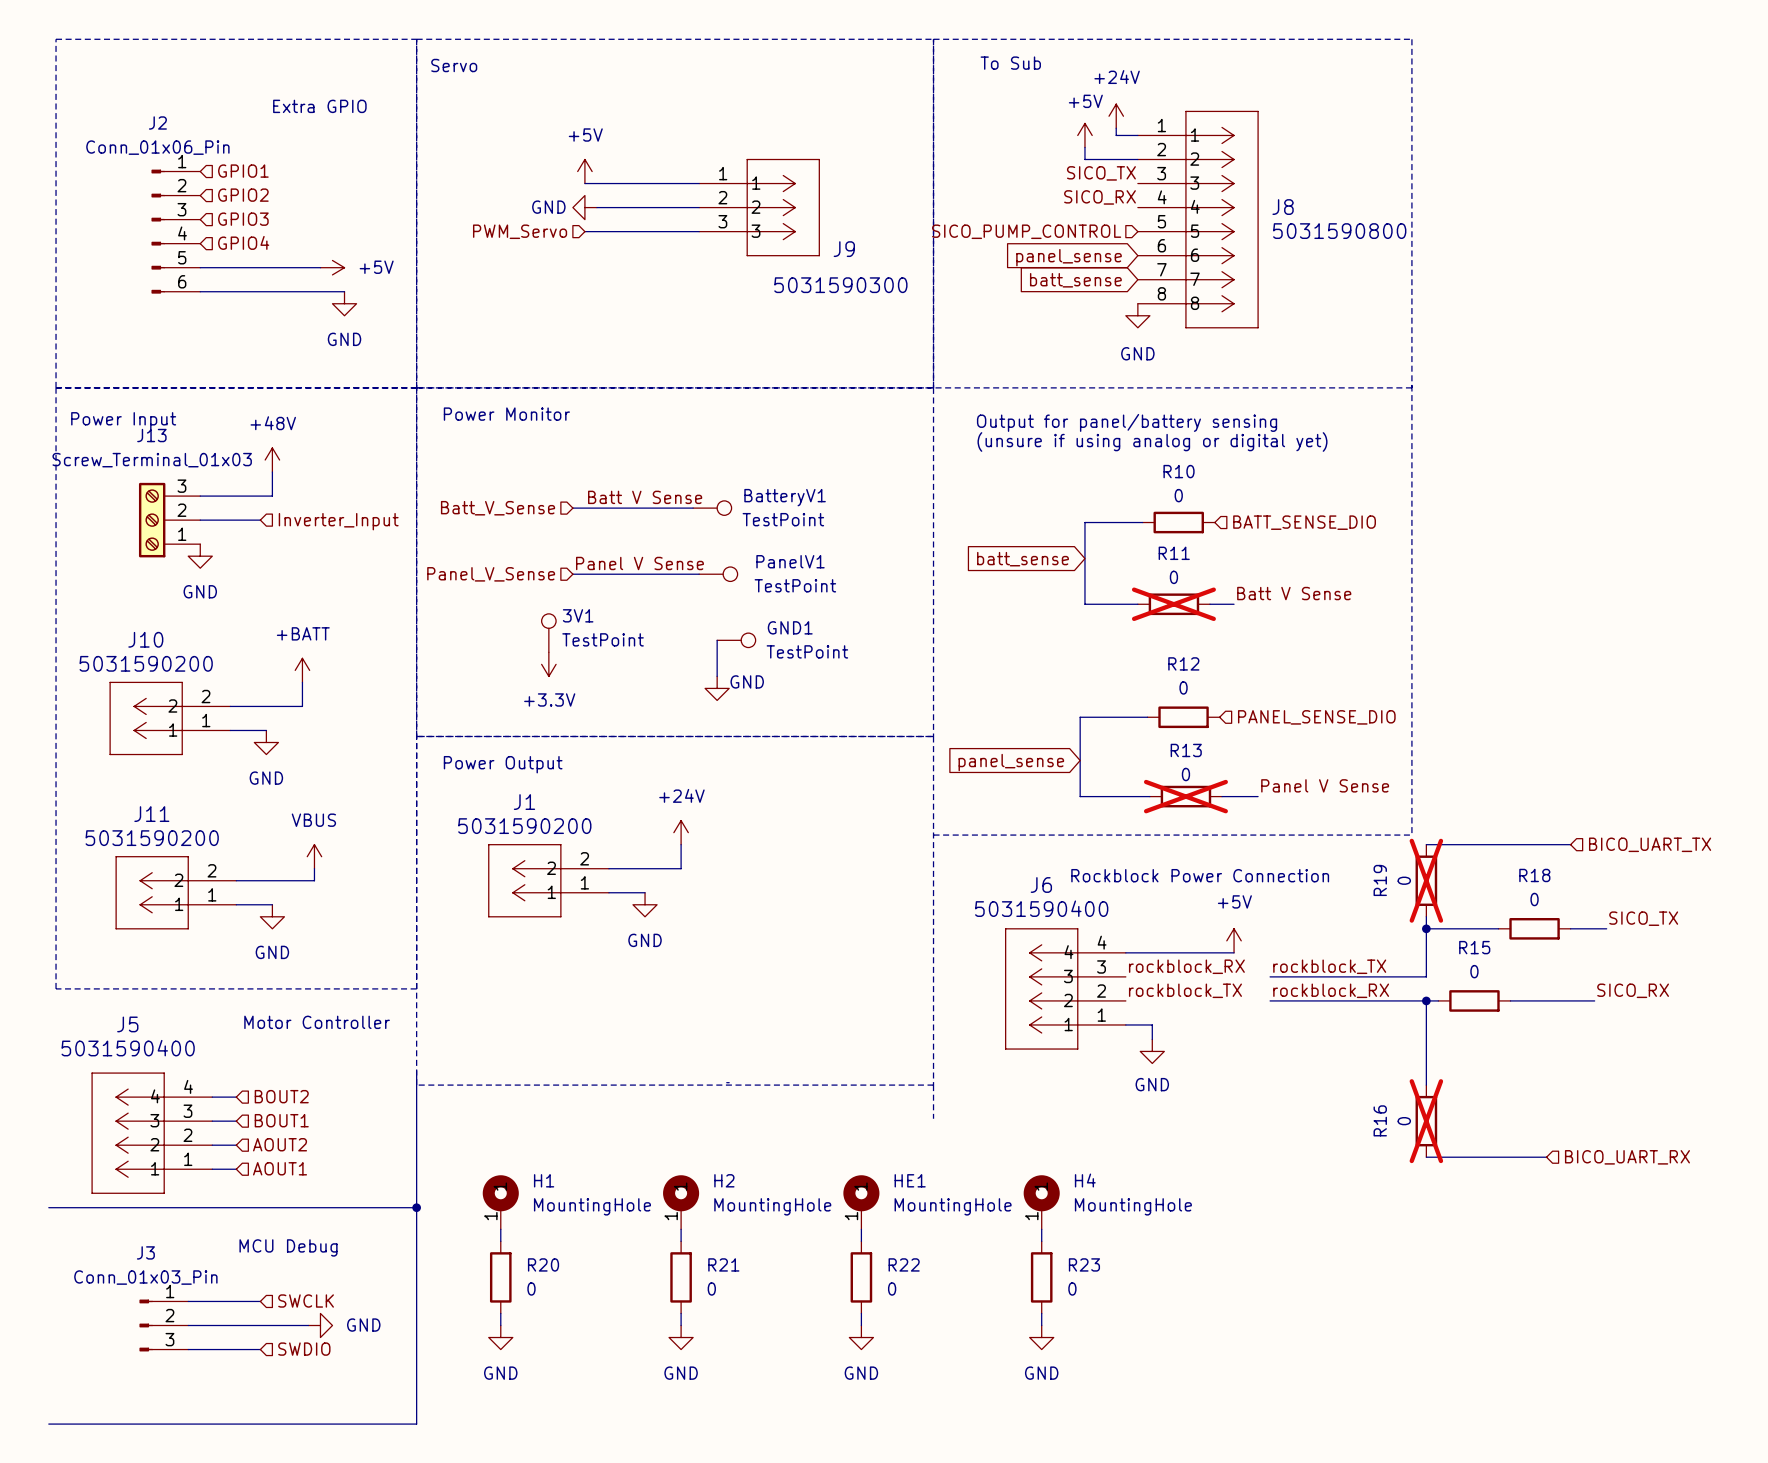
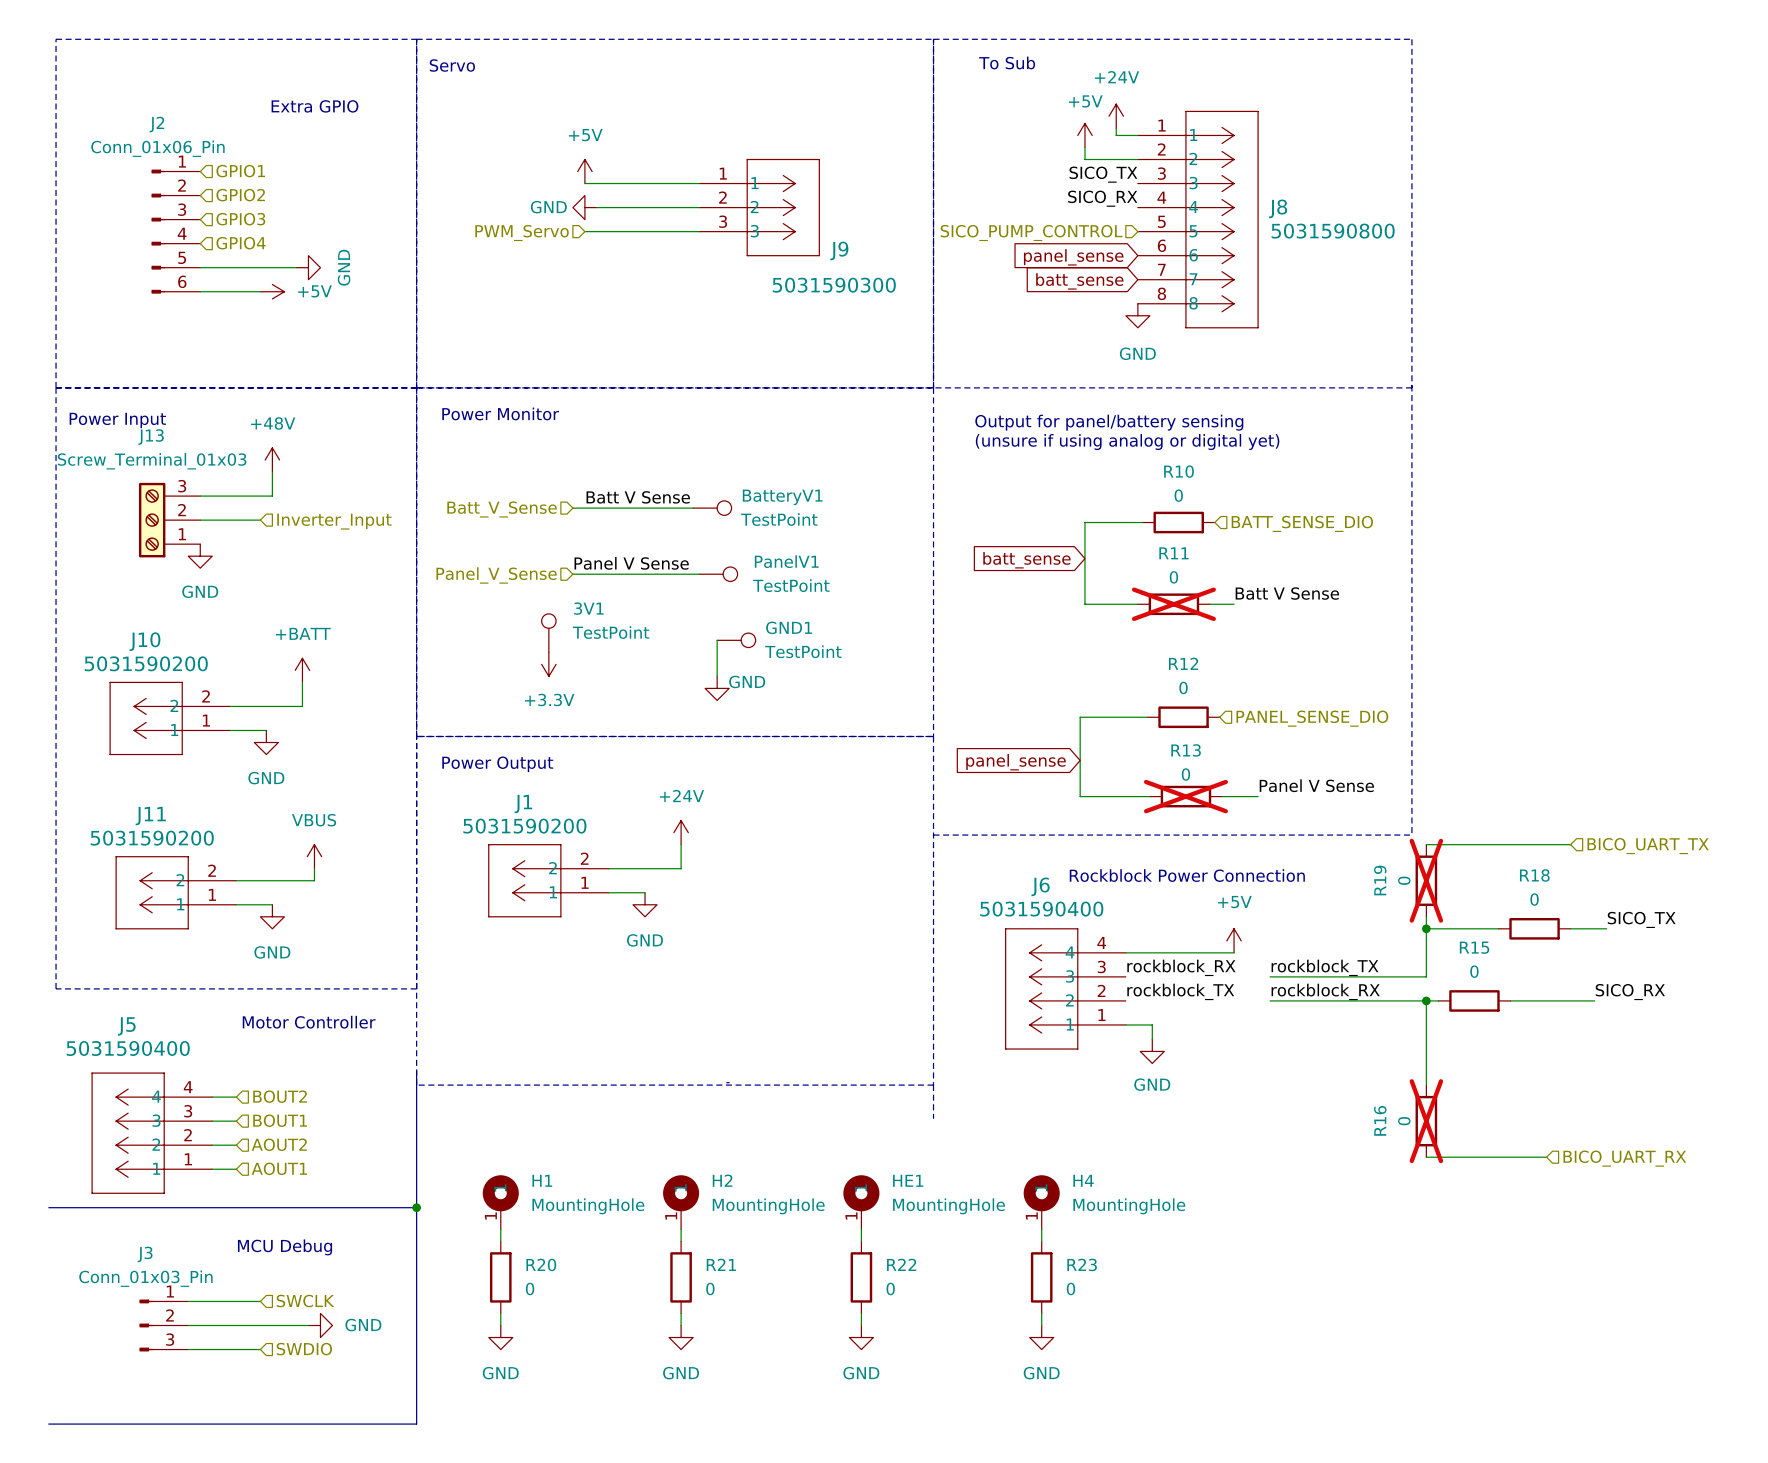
power symbol position: +5V (332, 267) -> +5V (272, 291)
wire: (260, 291) (344, 291) -> none
power symbol rotation: 0° (344, 303) -> 90° counterclockwise (308, 267)
power symbol position: GND (344, 303) -> GND (308, 267)
3V1 name position: 3V1 (578, 615) -> 3V1 (588, 608)
3V1 value position: TestPoint (603, 639) -> TestPoint (611, 632)

